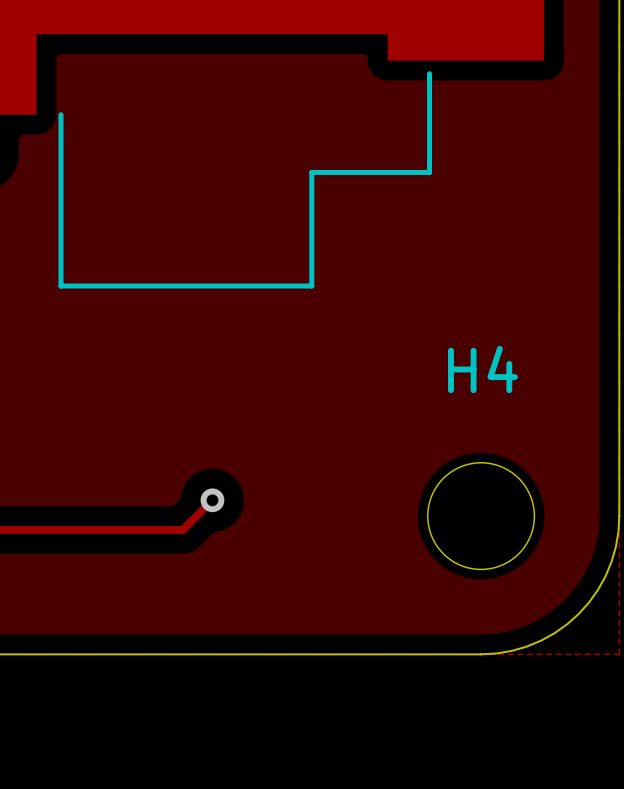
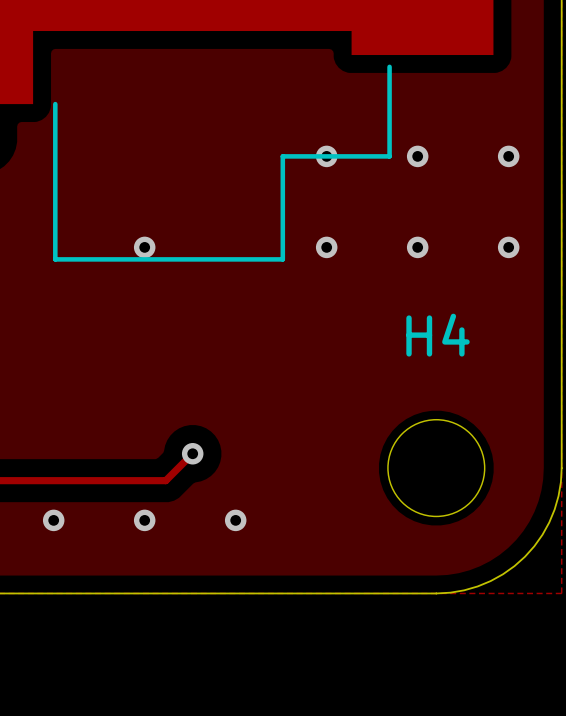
via: none -> (326, 156)
via: none -> (417, 156)
via: none -> (508, 156)
via: none -> (144, 247)
via: none -> (326, 247)
via: none -> (417, 247)
via: none -> (508, 247)
via: none -> (53, 520)
via: none -> (144, 520)
via: none -> (235, 520)

